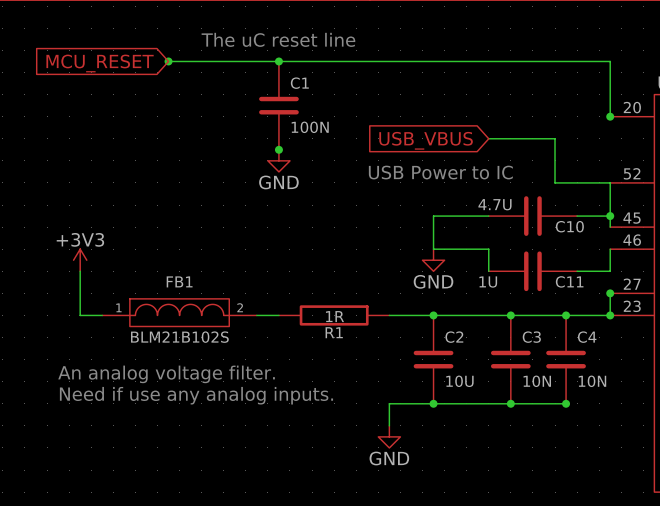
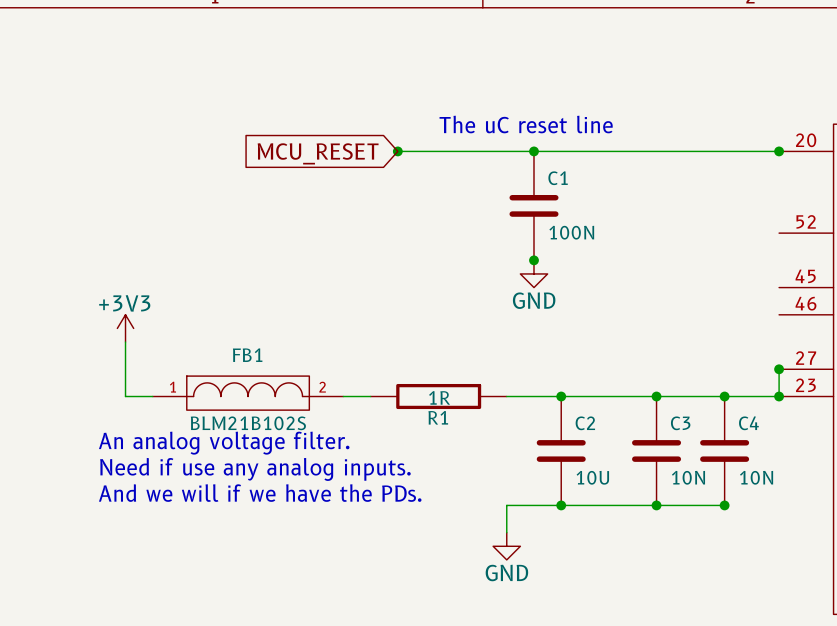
text position: The uC reset line (278, 39) -> The uC reset line (526, 124)
wire: (168, 61) (610, 61) (610, 116) -> (397, 151) (779, 151)
junction: (168, 61) -> none
junction: (278, 61) -> none
global label position: MCU_RESET (100, 63) -> MCU_RESET (318, 153)
C1 position: (278, 105) -> (533, 205)
junction: none -> (397, 151)
junction: none -> (533, 151)
wire: (488, 138) (555, 138) (555, 182) (610, 182) (610, 227) -> none
global label: USB_VBUS (426, 140) -> none
junction: (278, 149) -> none
power symbol: GND (278, 160) -> none
text: USB Power to IC (440, 172) -> none
junction: none -> (533, 260)
wire: (488, 216) (433, 216) (433, 249) (488, 249) (488, 271) -> none
C10: 4.7U (532, 216) -> none
wire: (577, 216) (610, 216) -> none
junction: (610, 216) -> none
wire: (610, 249) (610, 271) (577, 271) -> none
power symbol position: GND (433, 260) -> GND (533, 273)
C11: 1U (532, 271) -> none
text: none -> An analog voltage filter. (224, 443)
text: An analog voltage filter. (166, 374) -> Need if use any analog inputs. (255, 469)
text: Need if use any analog inputs. (196, 395) -> And we will if we have the PDs. (260, 493)

